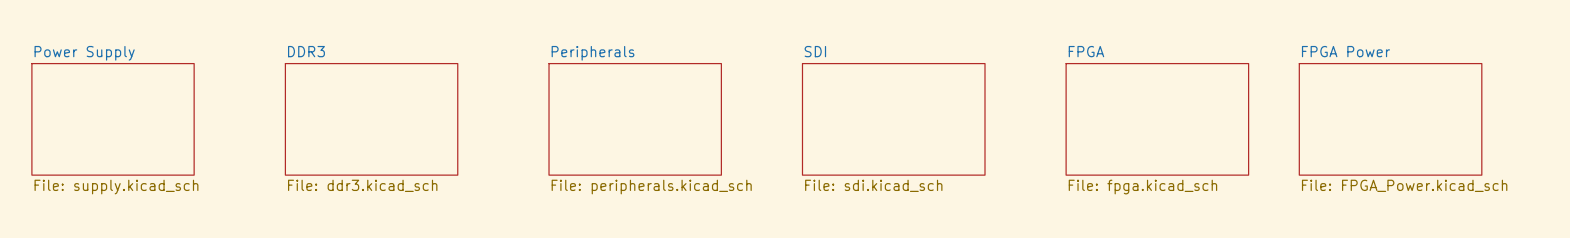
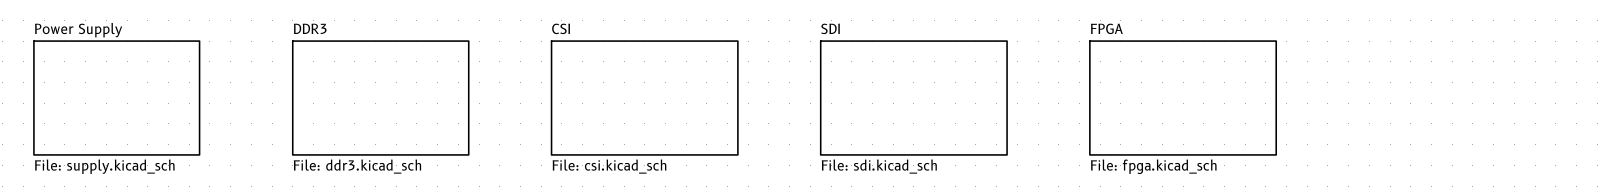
sheet CSI: none -> File: csi.kicad_sch (644, 98)
sheet Peripherals: File: peripherals.kicad_sch (635, 119) -> none
sheet FPGA Power: File: FPGA_Power.kicad_sch (1390, 119) -> none

